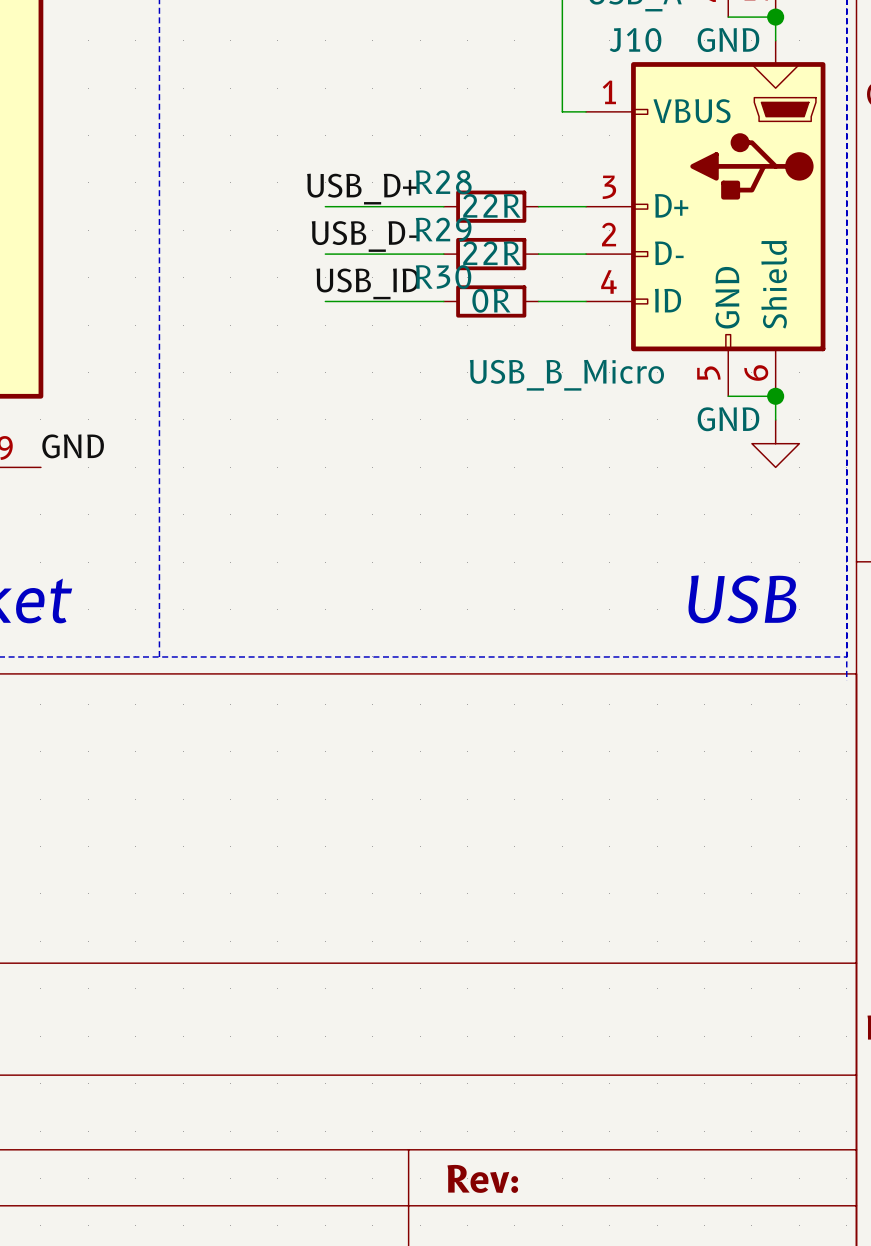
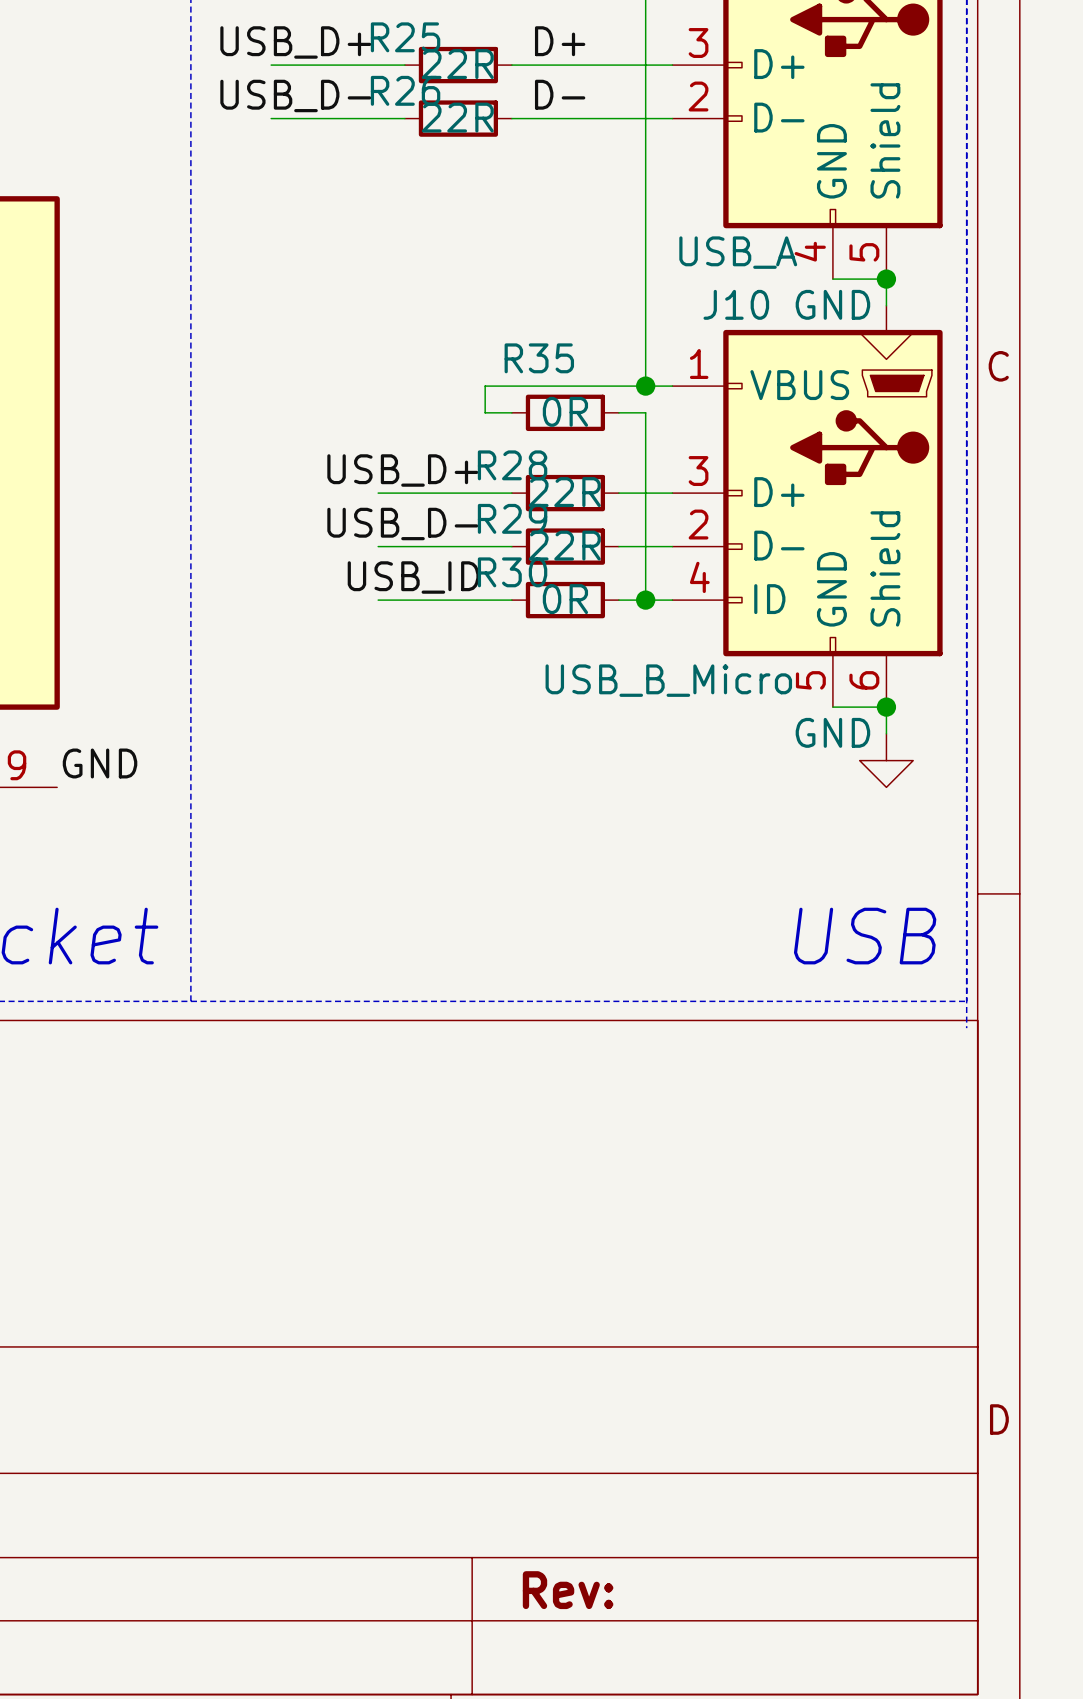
wire: none -> (645, 386) (485, 386) (485, 412) (511, 412)
junction: none -> (645, 386)
R35: none -> 0R (565, 412)
wire: none -> (618, 412) (645, 412) (645, 600)
junction: none -> (645, 600)

